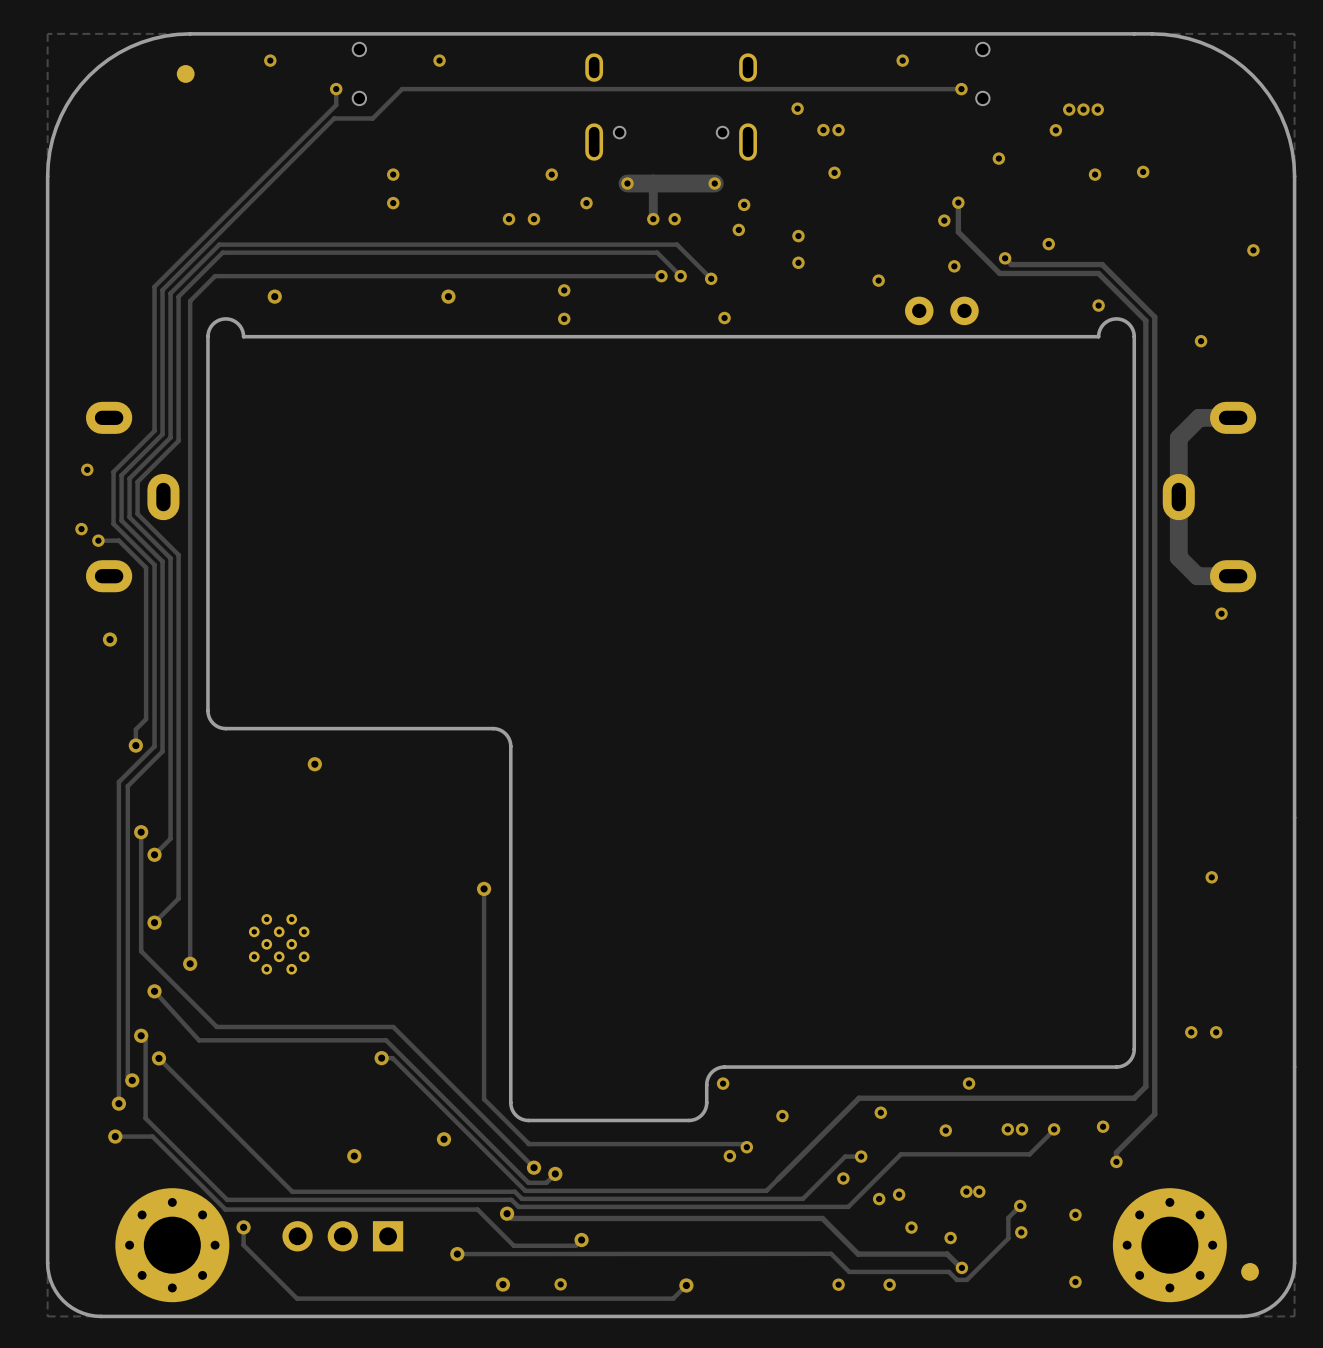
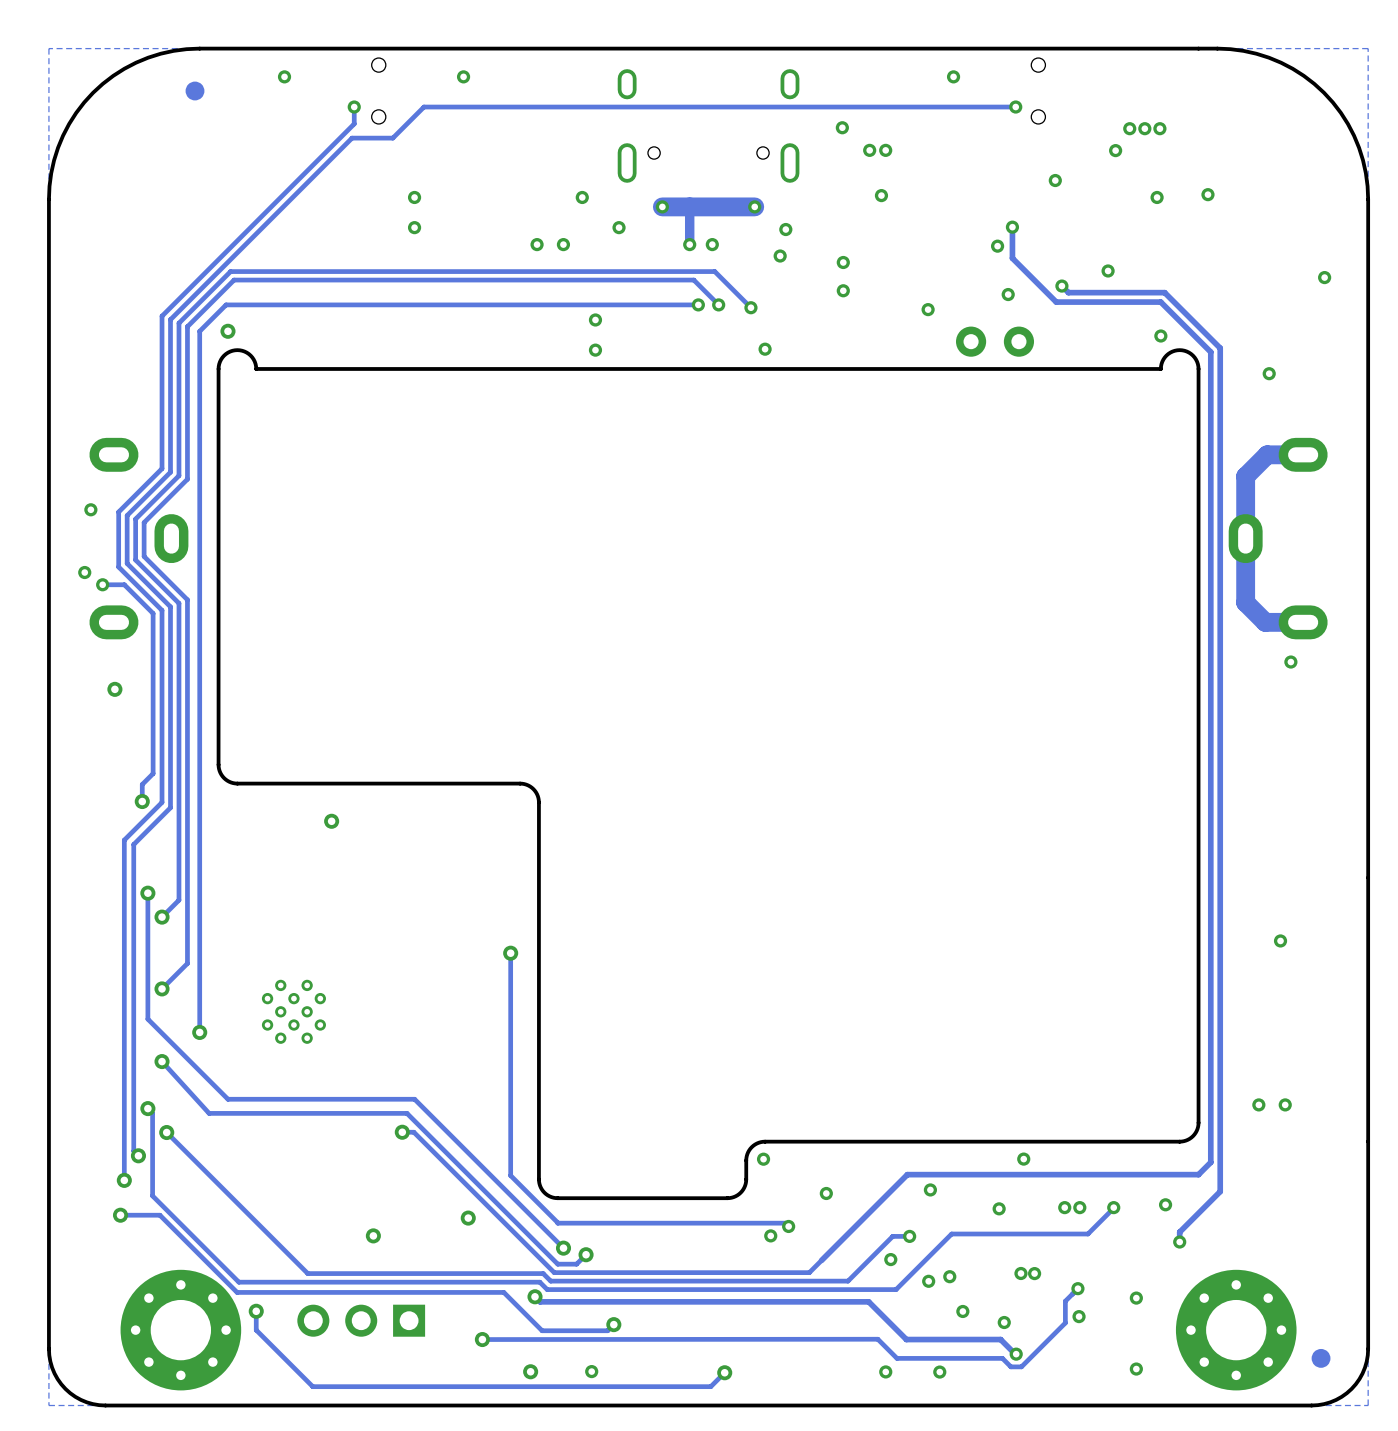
via position: (274, 296) -> (227, 331)
via: (448, 296) -> none

